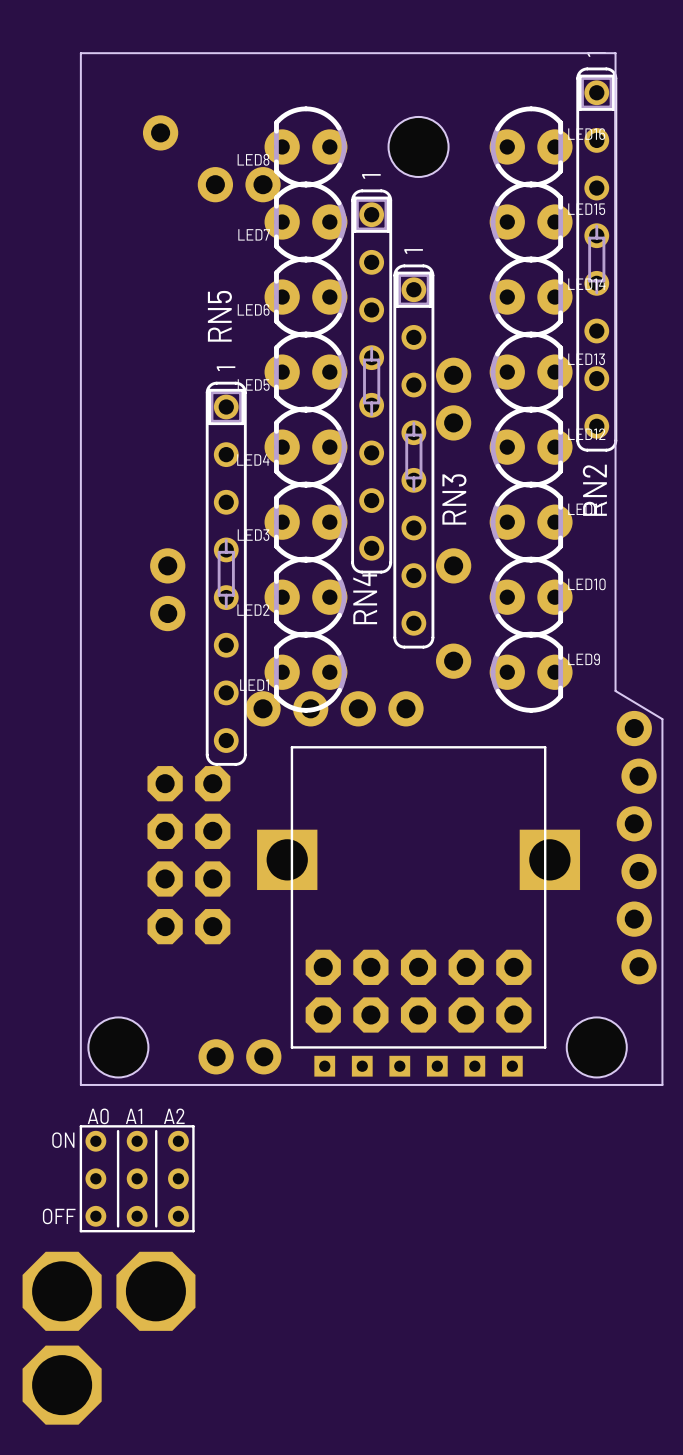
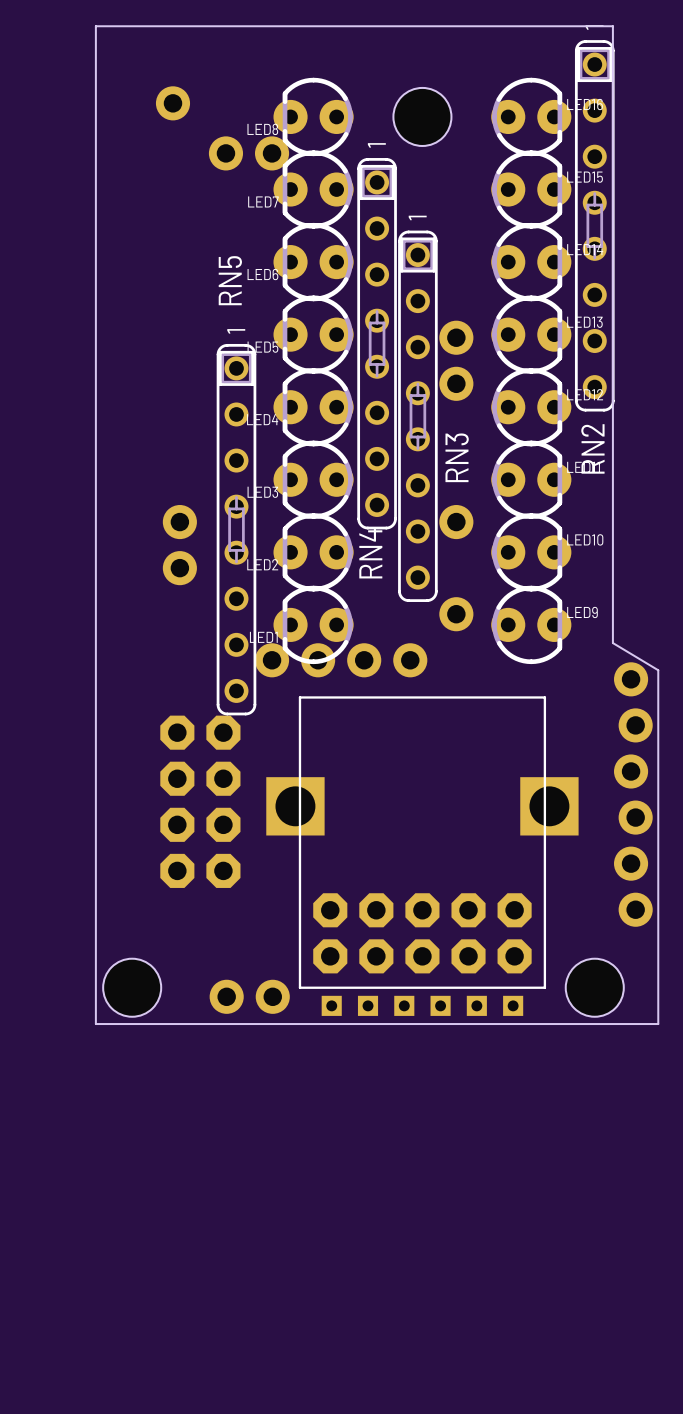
part: (137, 1178) -> none
part: (62, 1291) -> none
part: (155, 1291) -> none
part: (62, 1385) -> none

